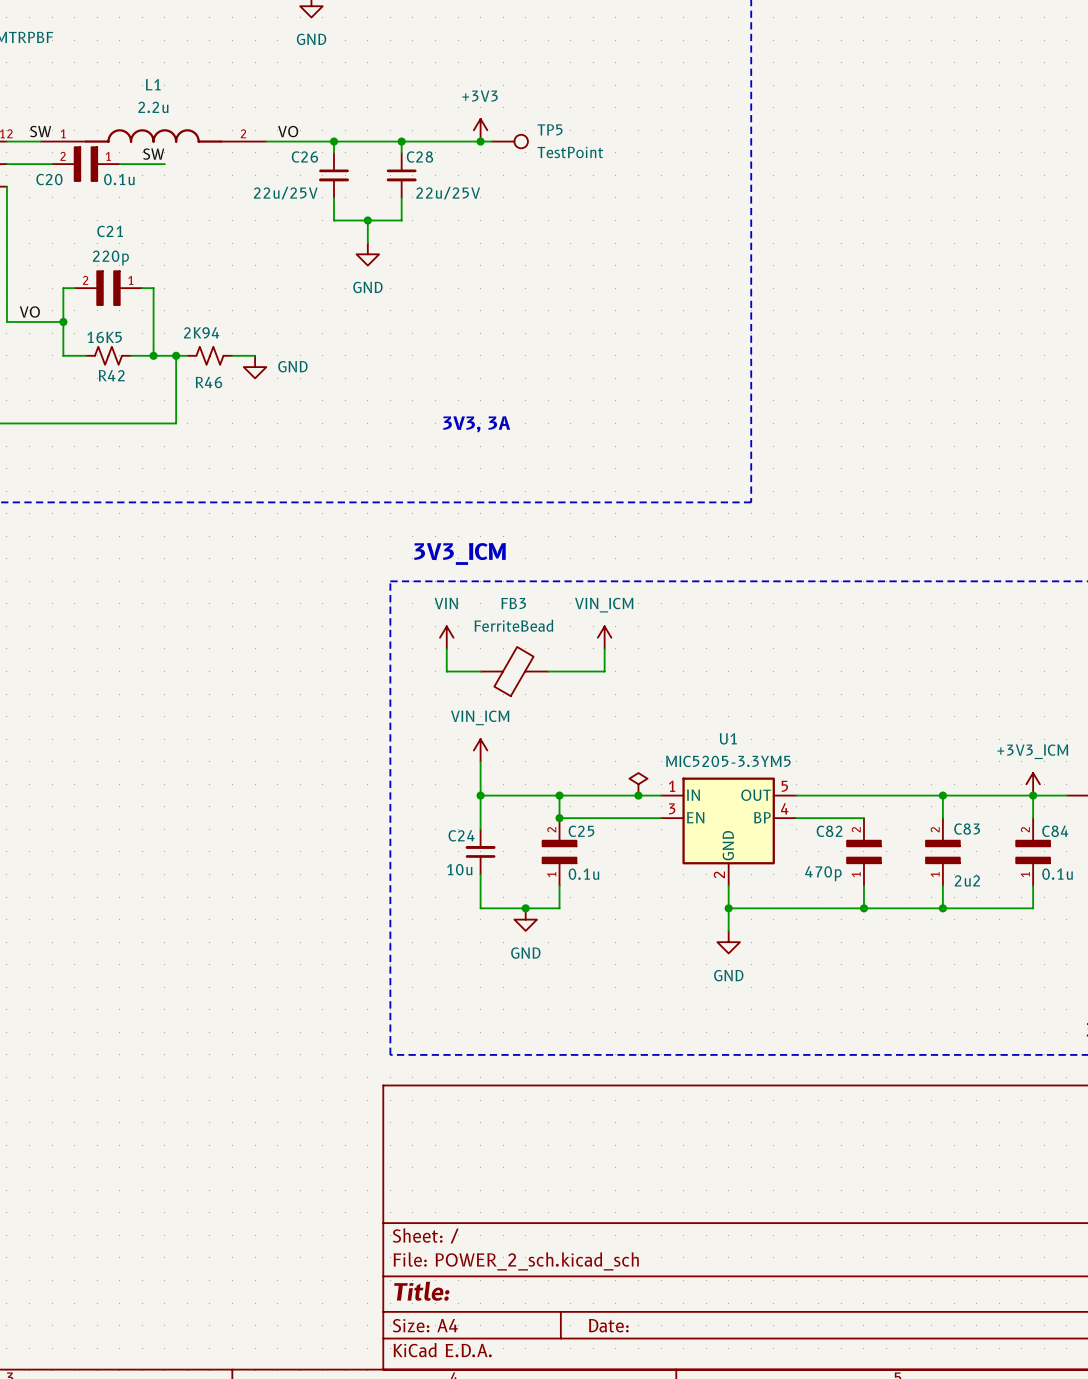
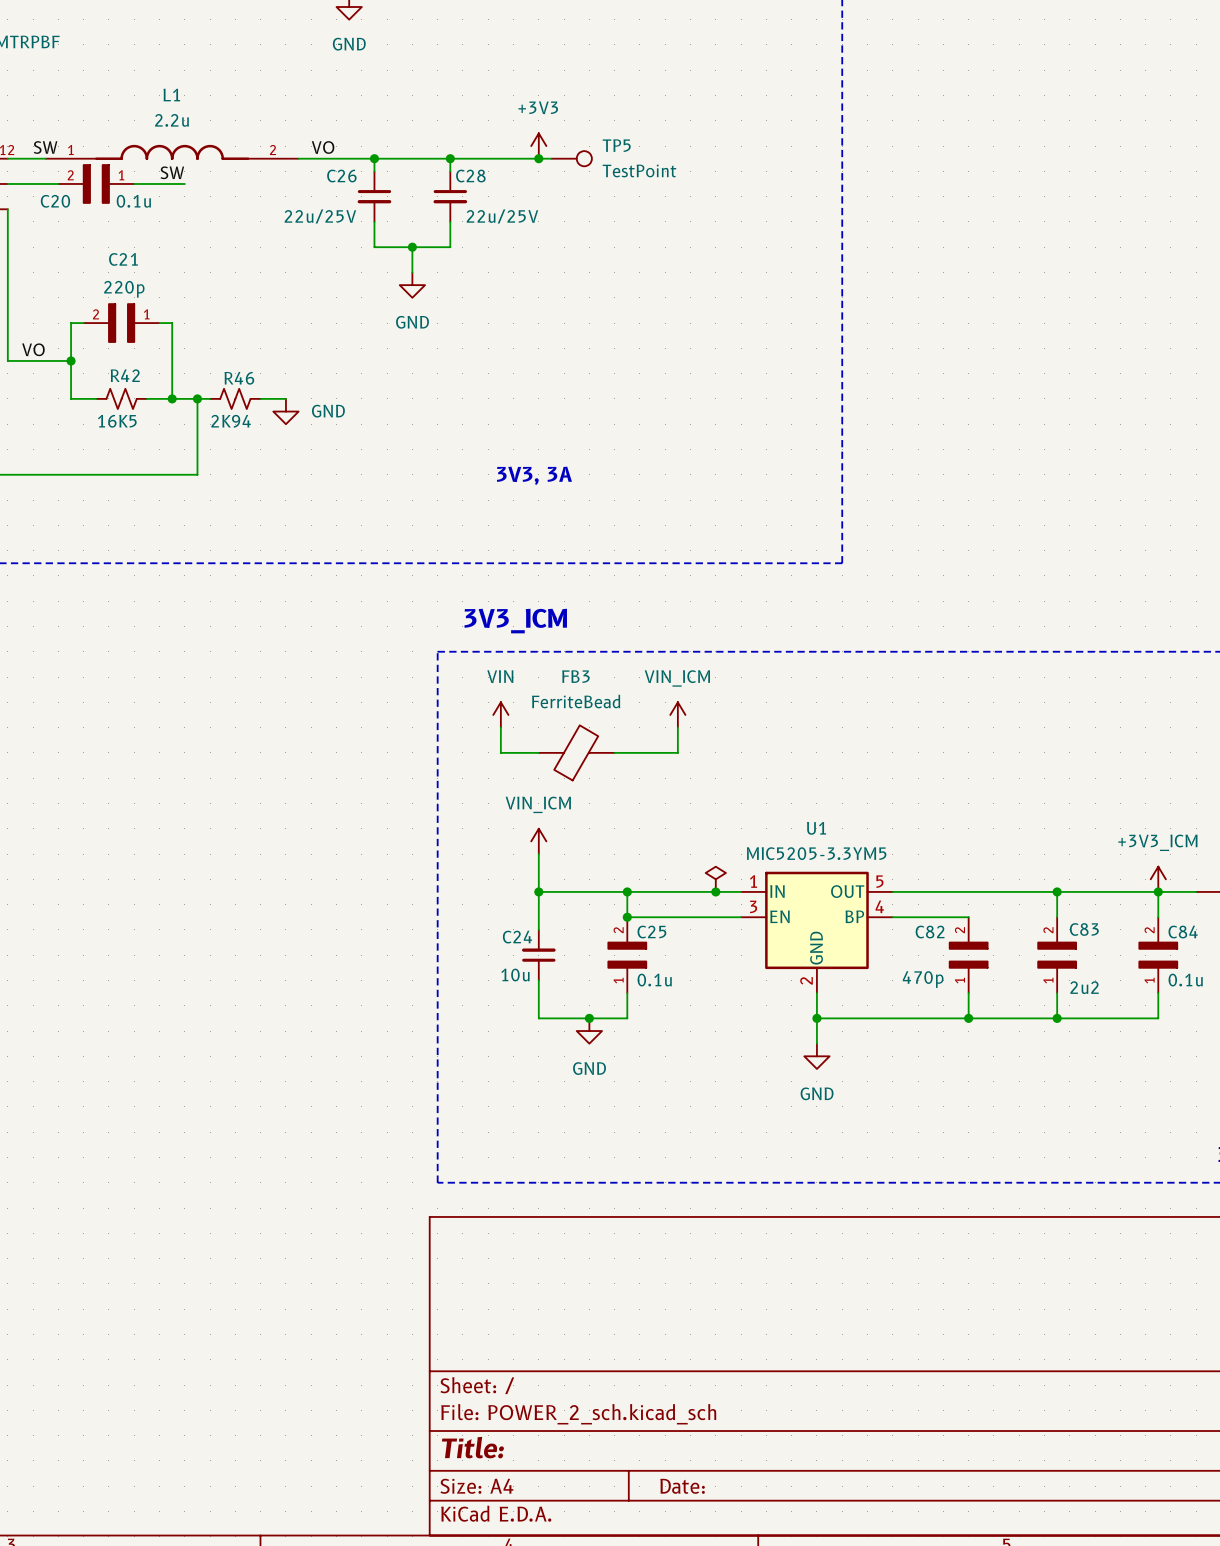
R46 value position: 2K94 (201, 332) -> 2K94 (231, 421)
R42 value position: 16K5 (104, 337) -> 16K5 (117, 421)
R42 name position: R42 (111, 375) -> R42 (125, 375)
R46 name position: R46 (208, 382) -> R46 (239, 378)

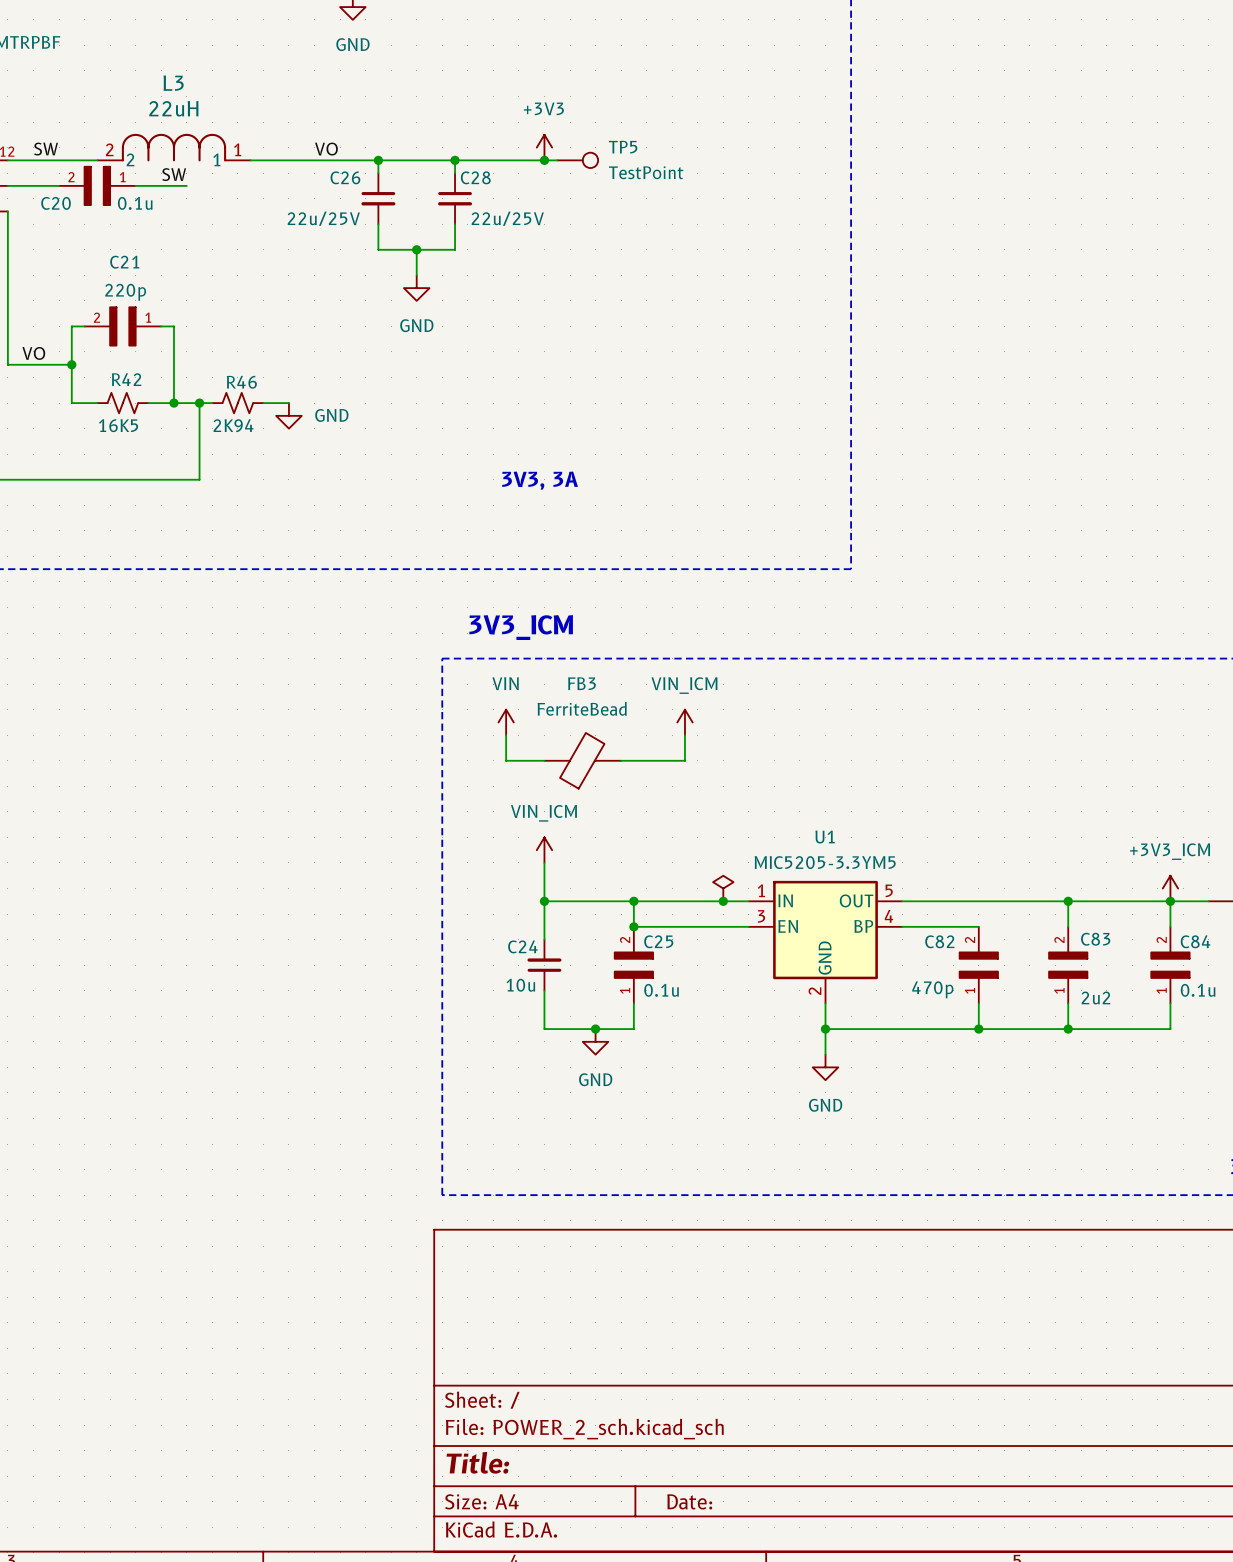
L3: none -> 22uH (173, 147)
L1: 2.2u (172, 152) -> none

